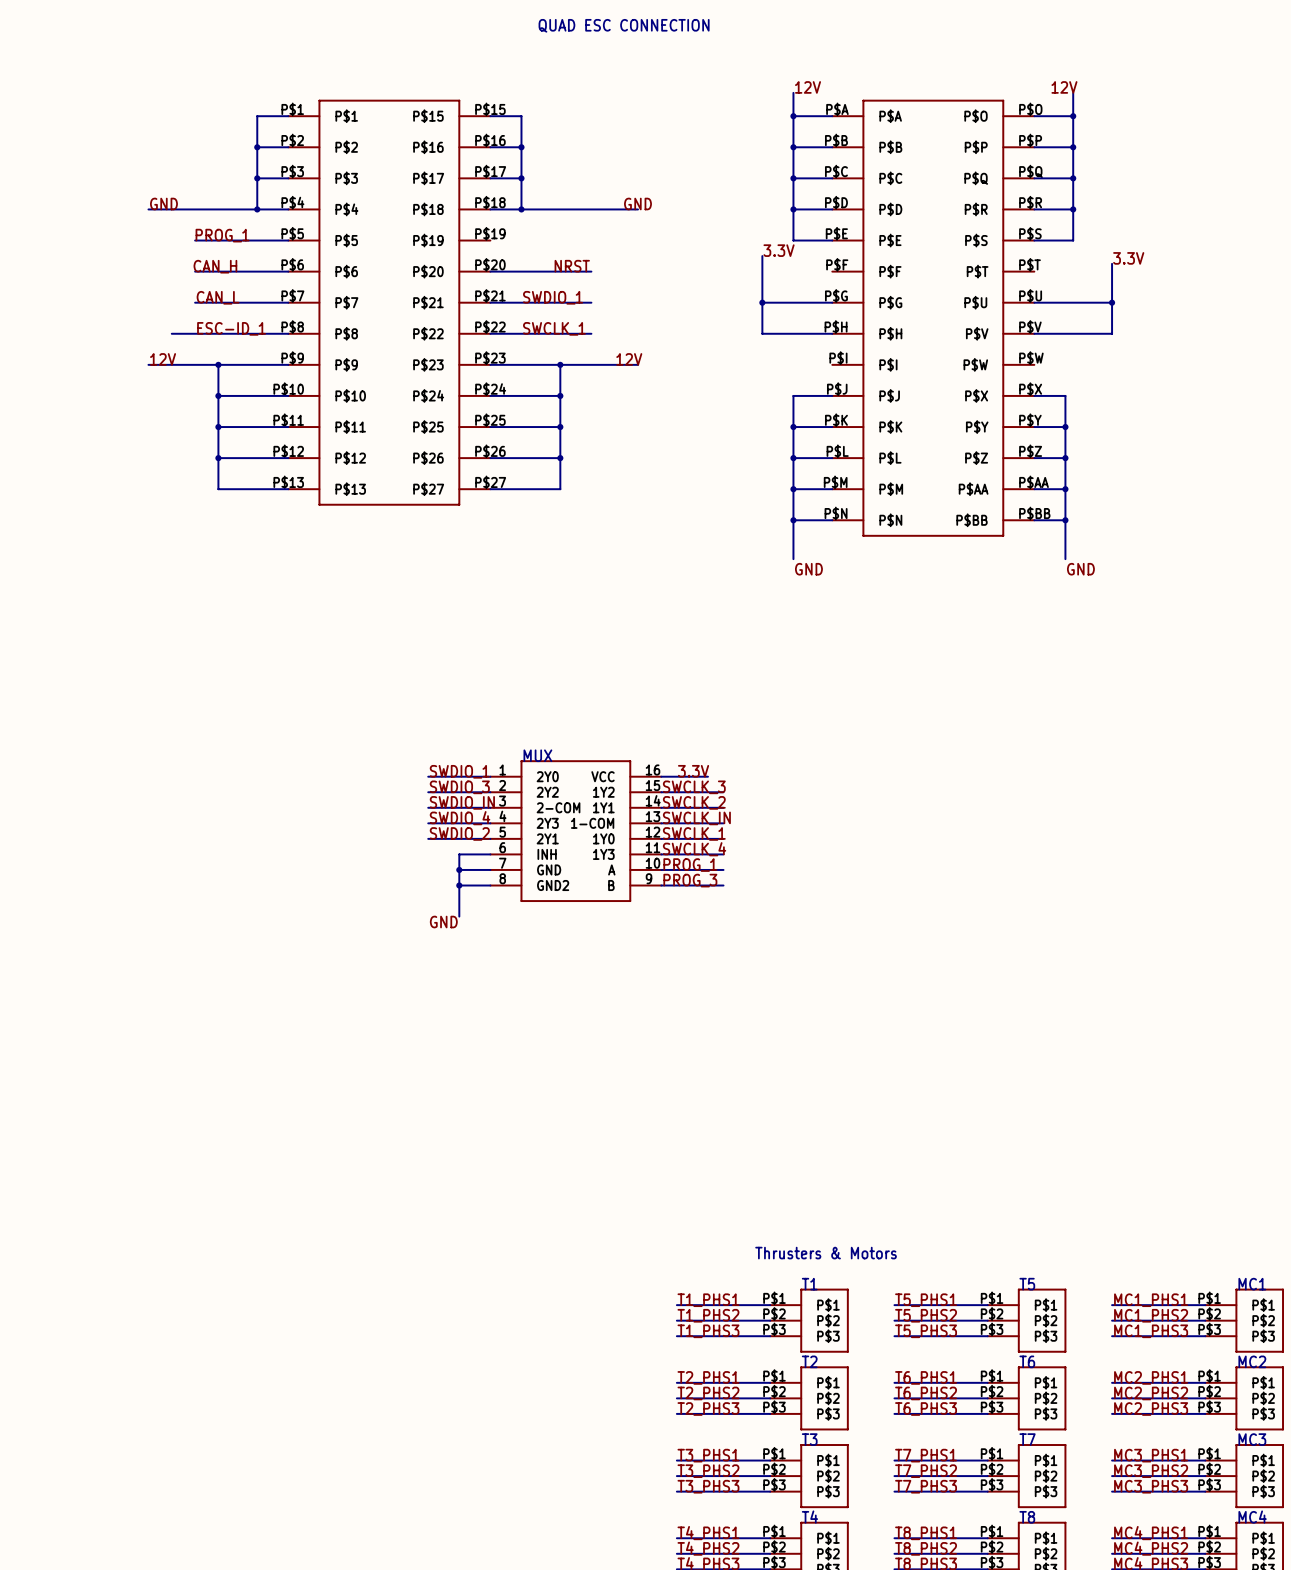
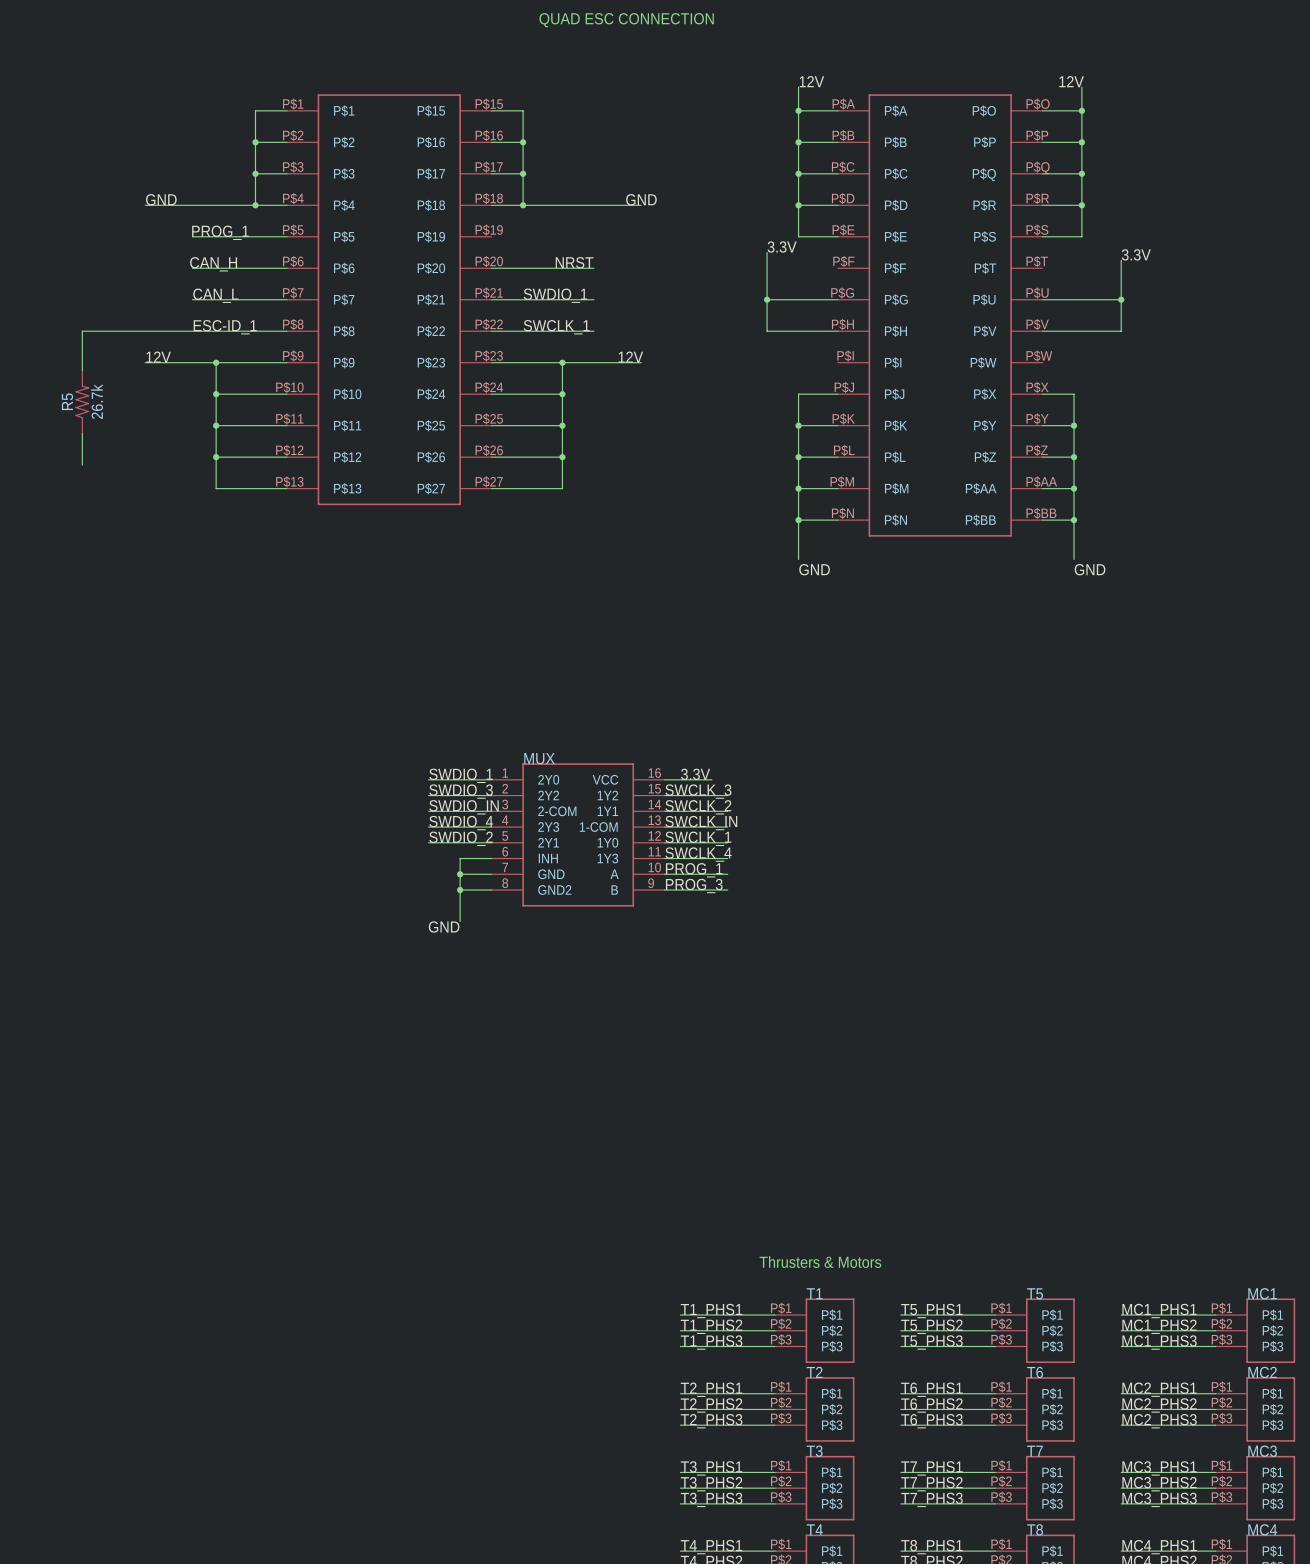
wire: none -> (168, 331) (82, 331) (82, 370)
R5: none -> 26.7k (82, 402)
wire: none -> (82, 433) (82, 465)

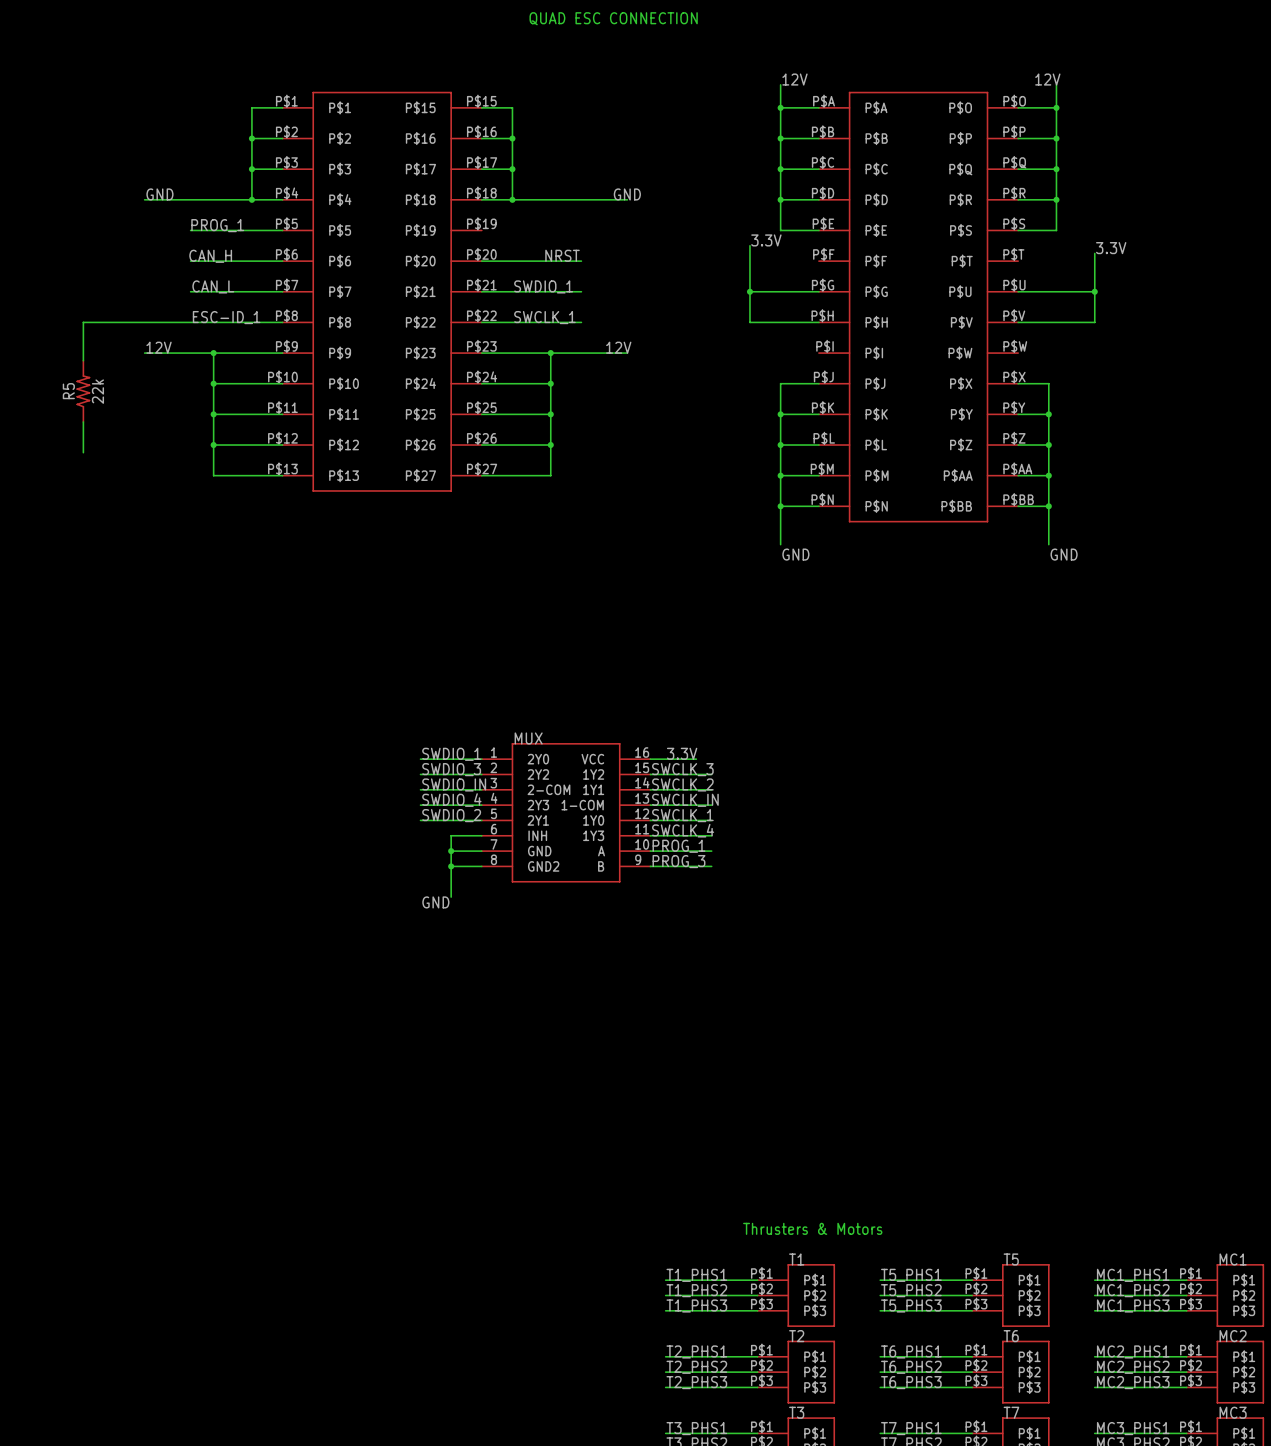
R5 value: 26.7k (97, 401) -> 22k (97, 391)

